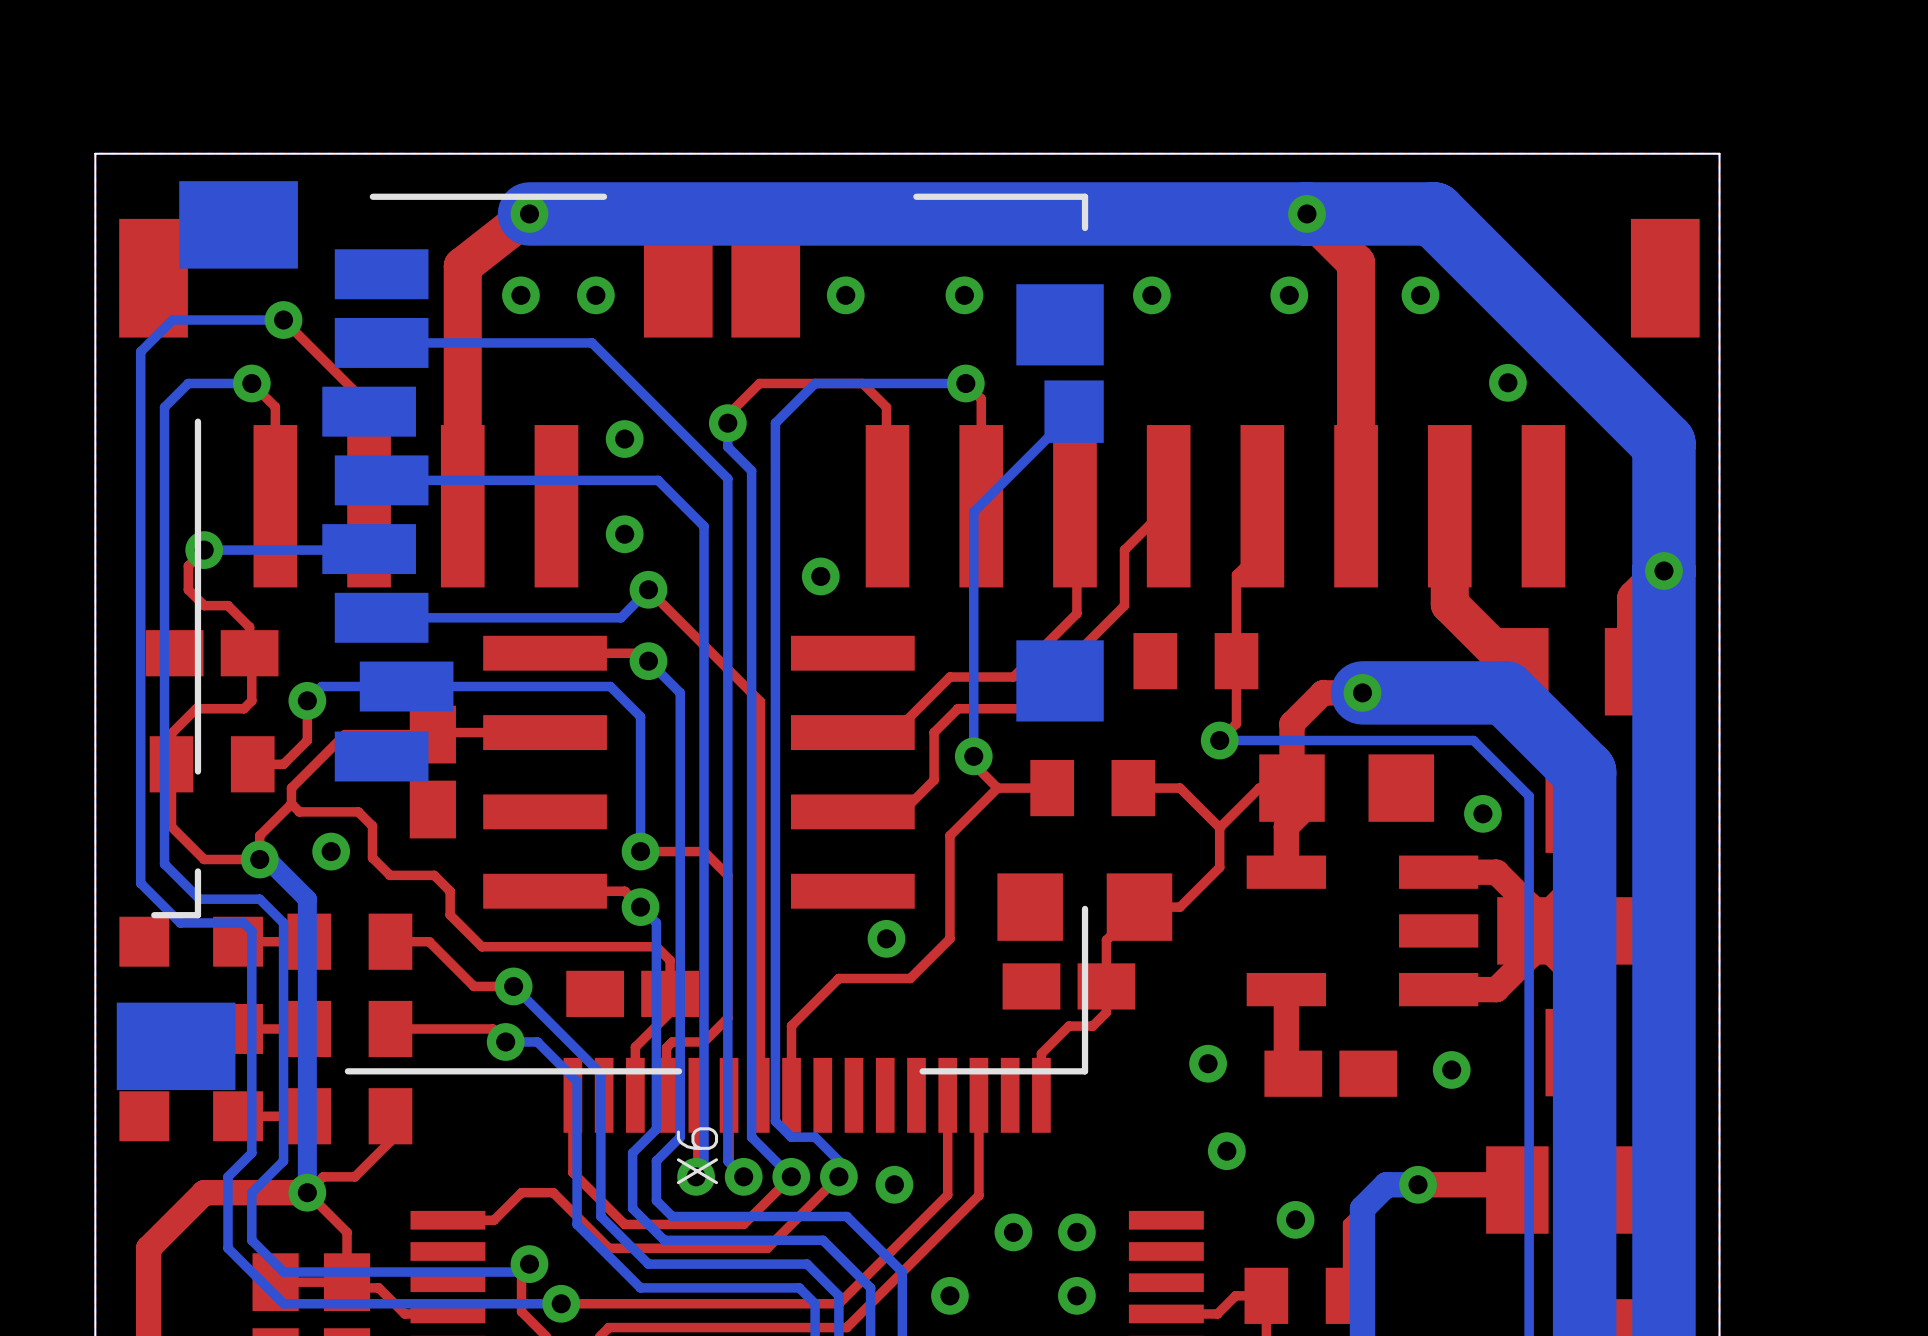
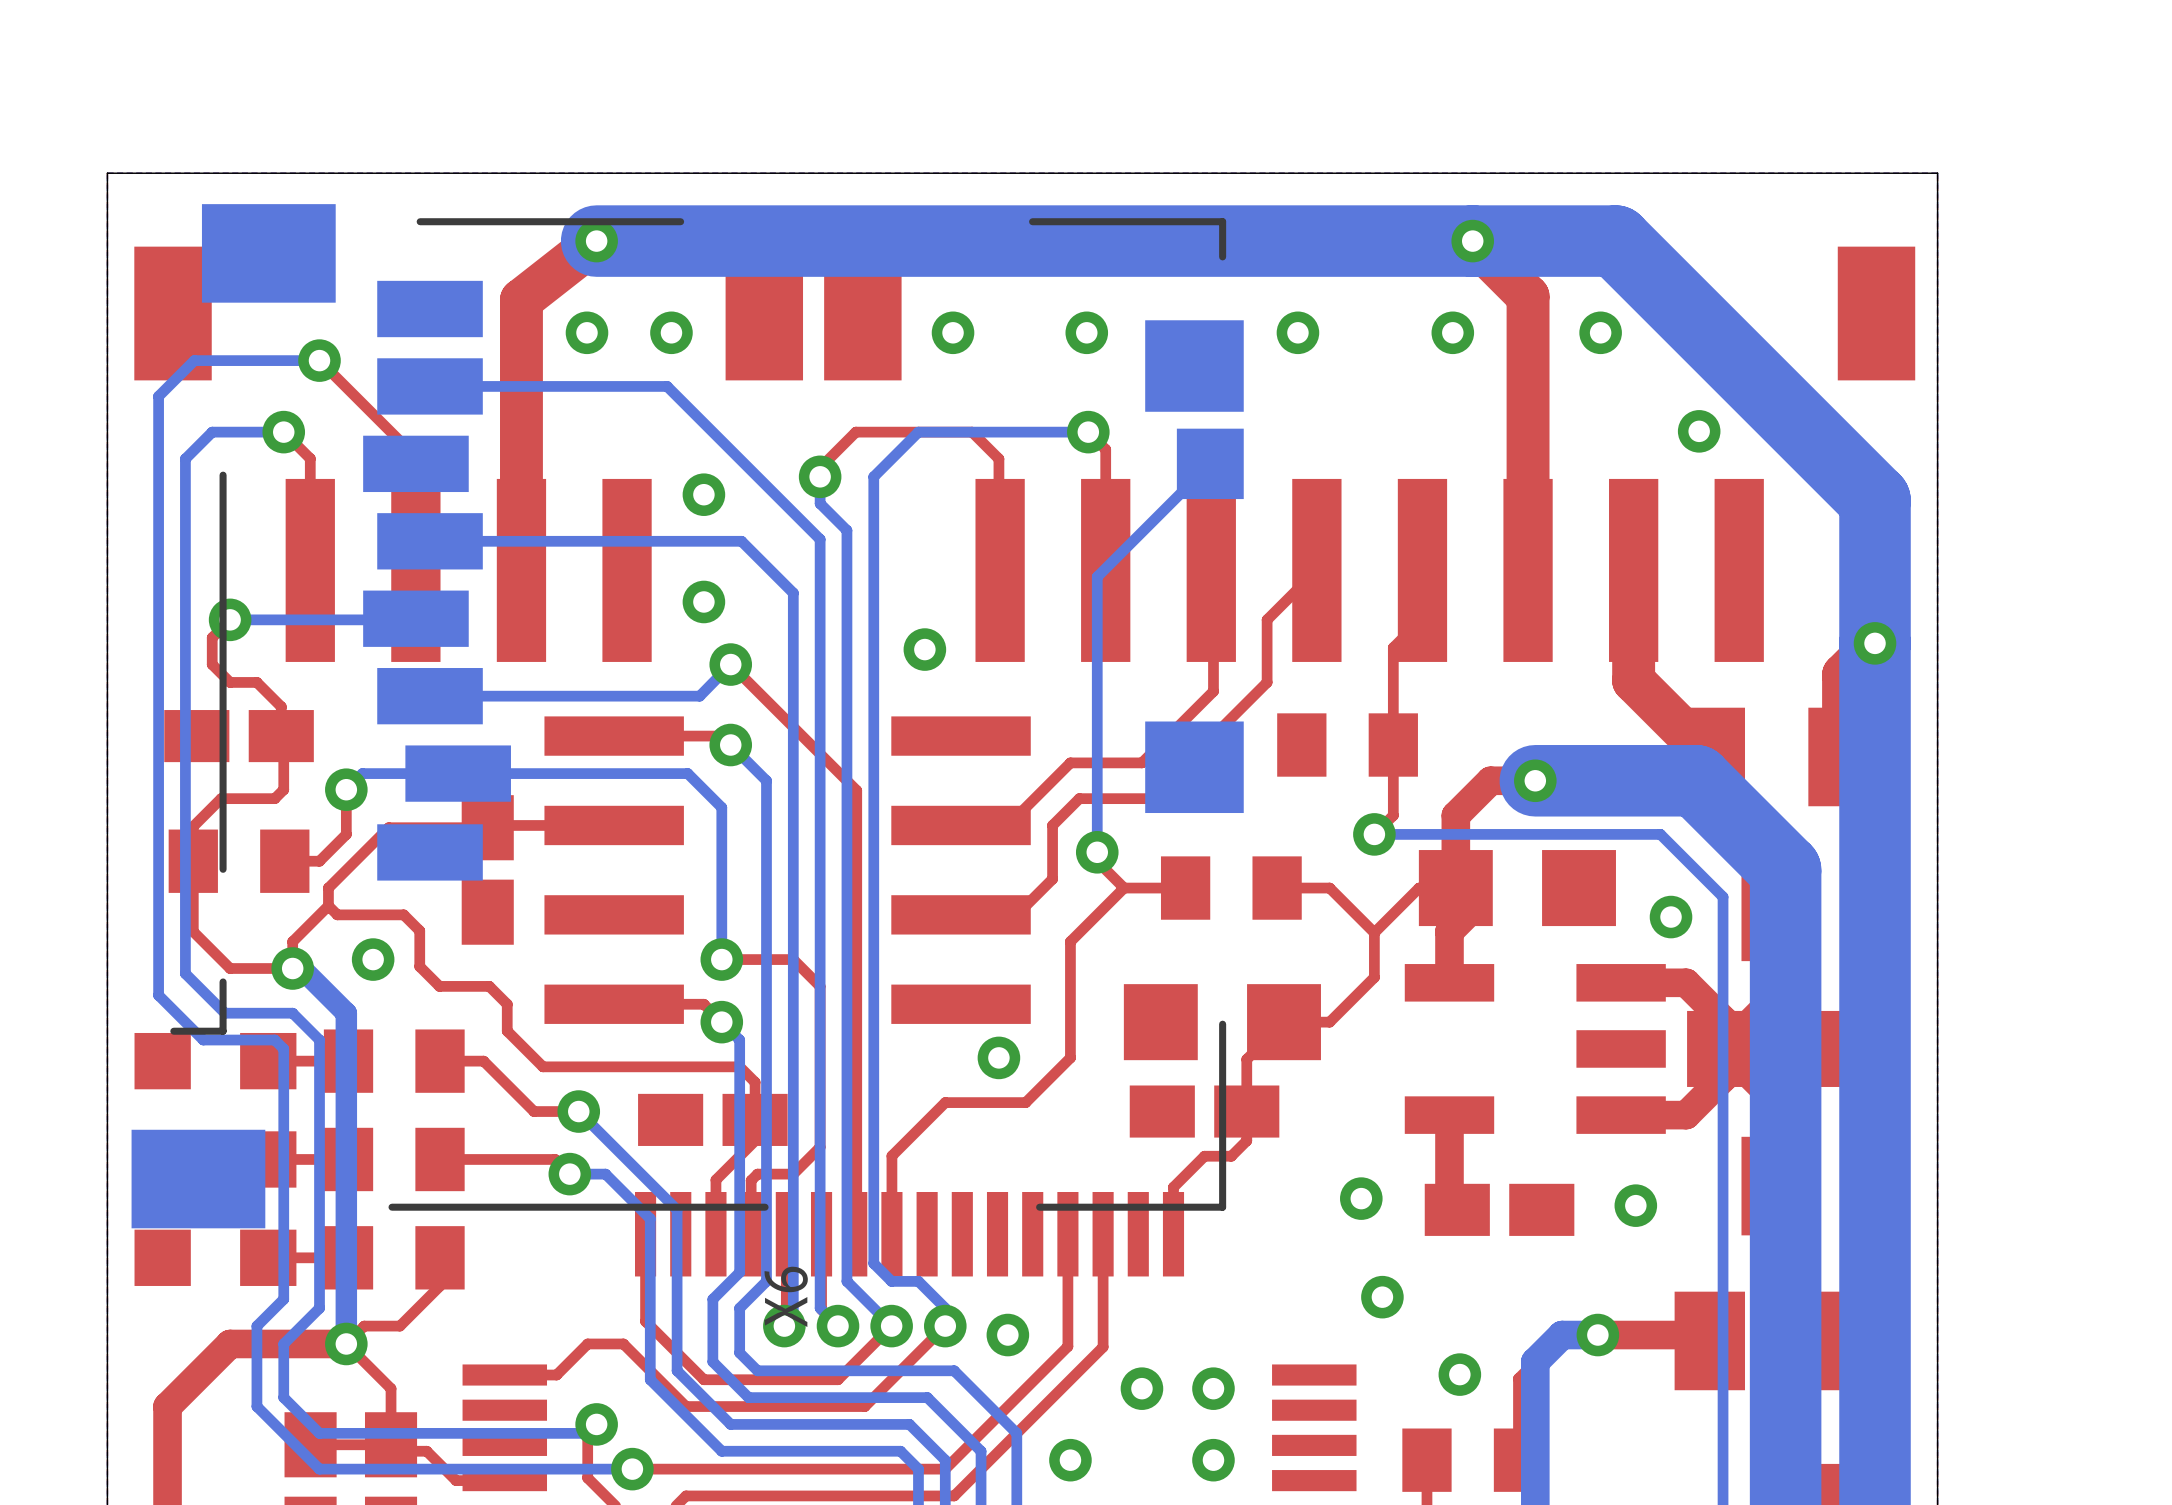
top track: (1266, 1295) (1235, 1295) (1217, 1313) (1166, 1313) -> none

